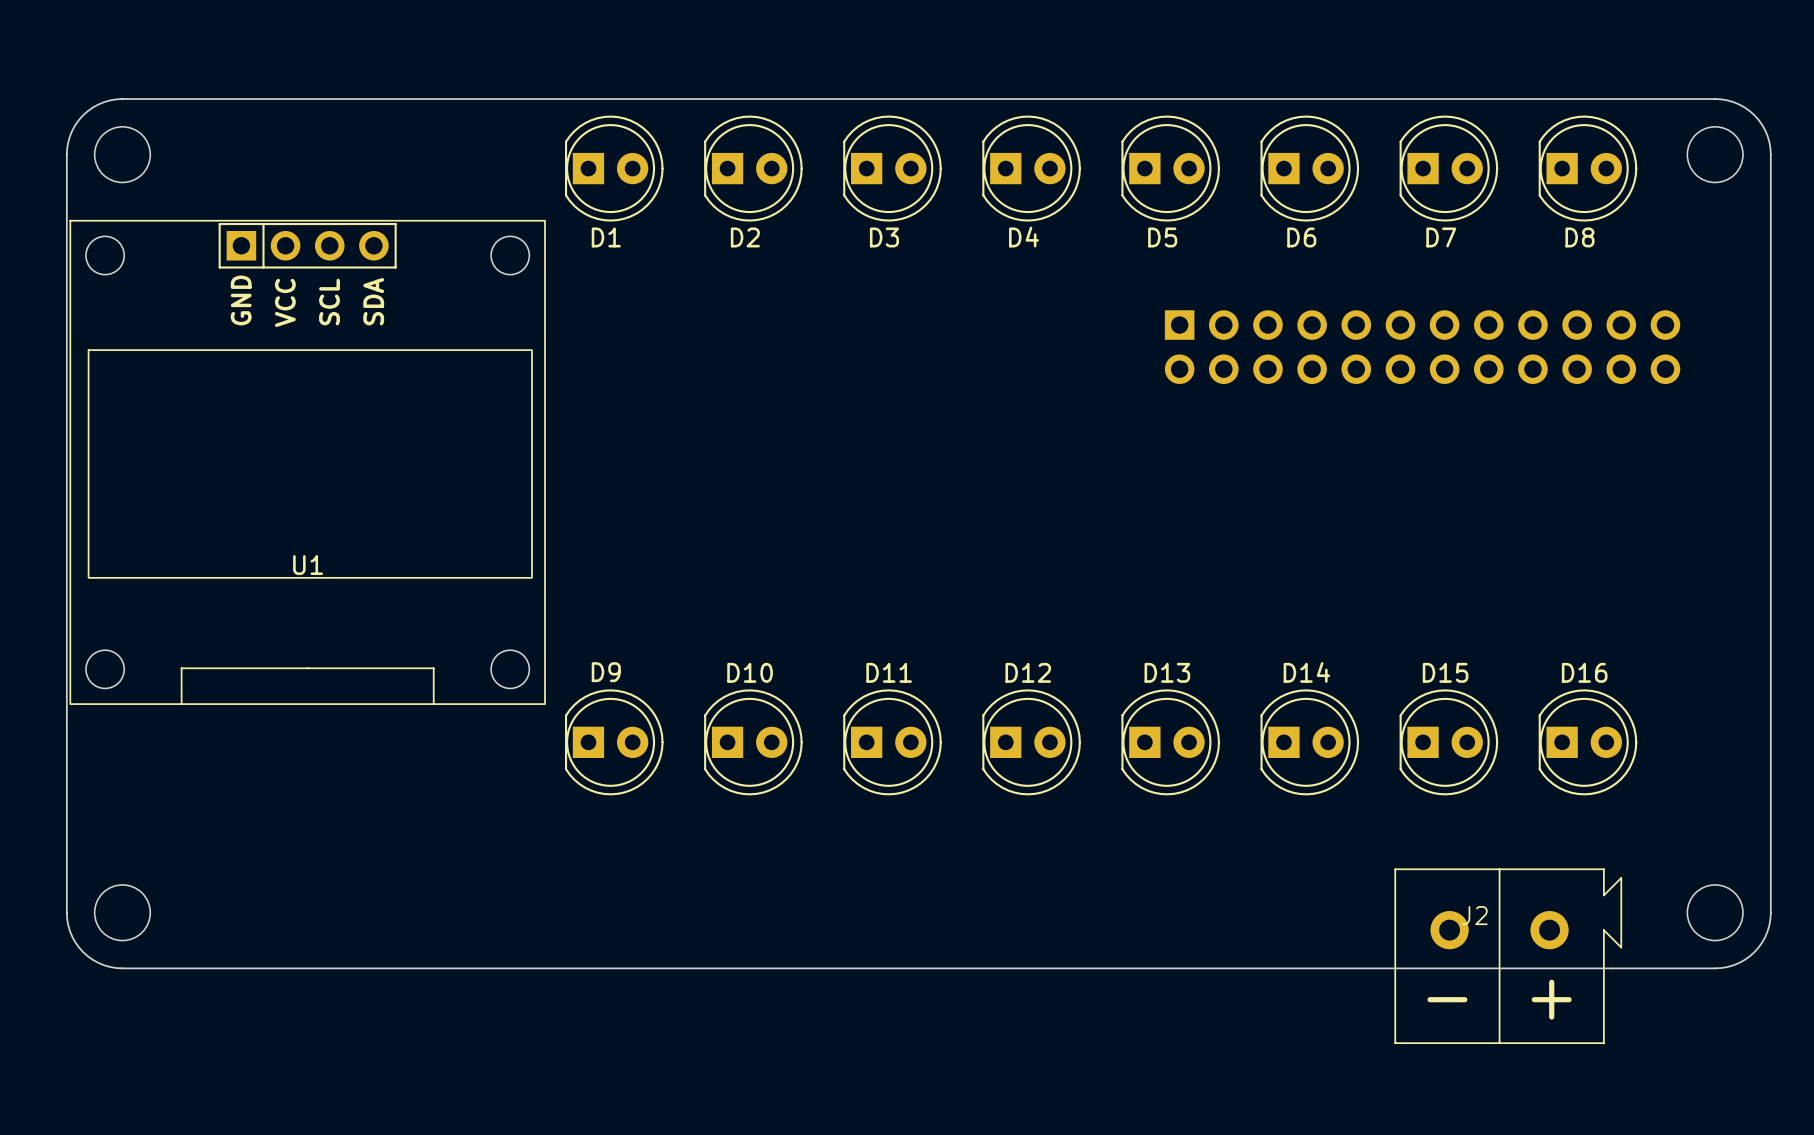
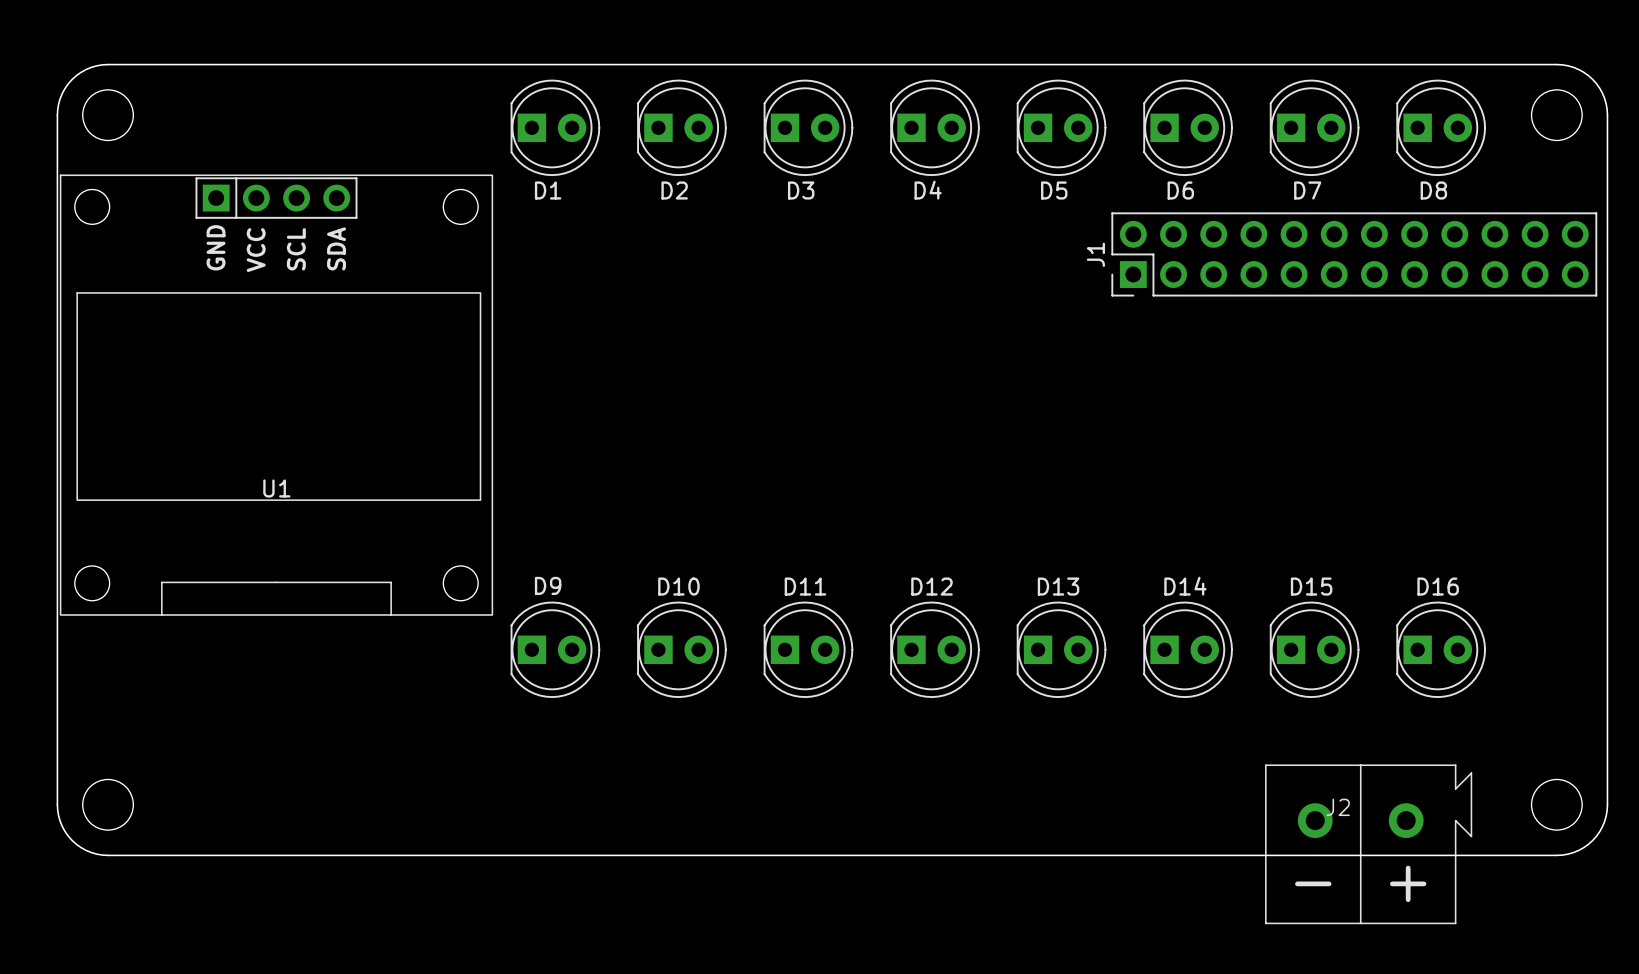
J1 side: bottom (1422, 347) -> top (1354, 254)

